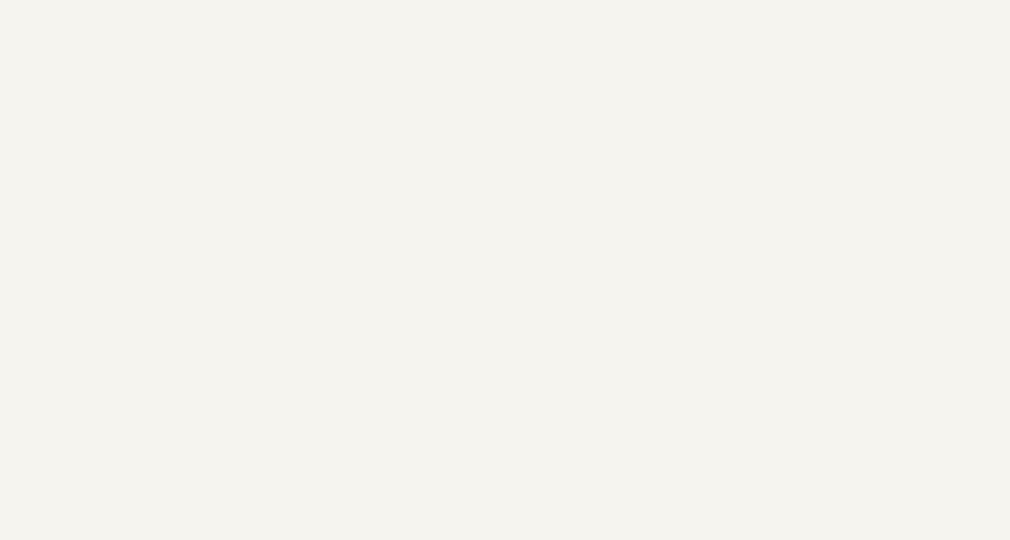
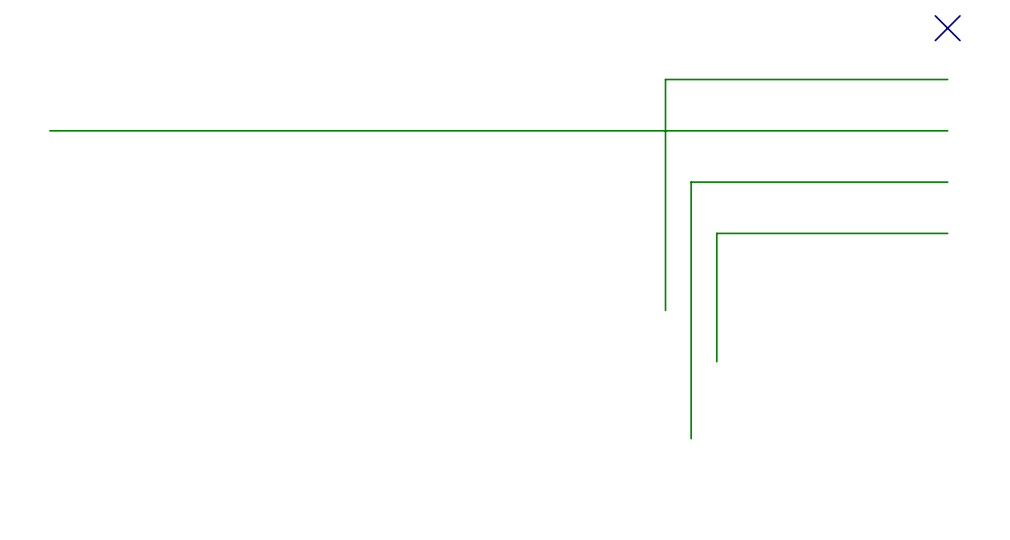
no-connect mark: none -> (947, 28)
wire: none -> (947, 79) (665, 79) (665, 310)
wire: none -> (49, 130) (947, 130)
wire: none -> (947, 182) (691, 182) (691, 438)
wire: none -> (947, 233) (716, 233) (716, 361)

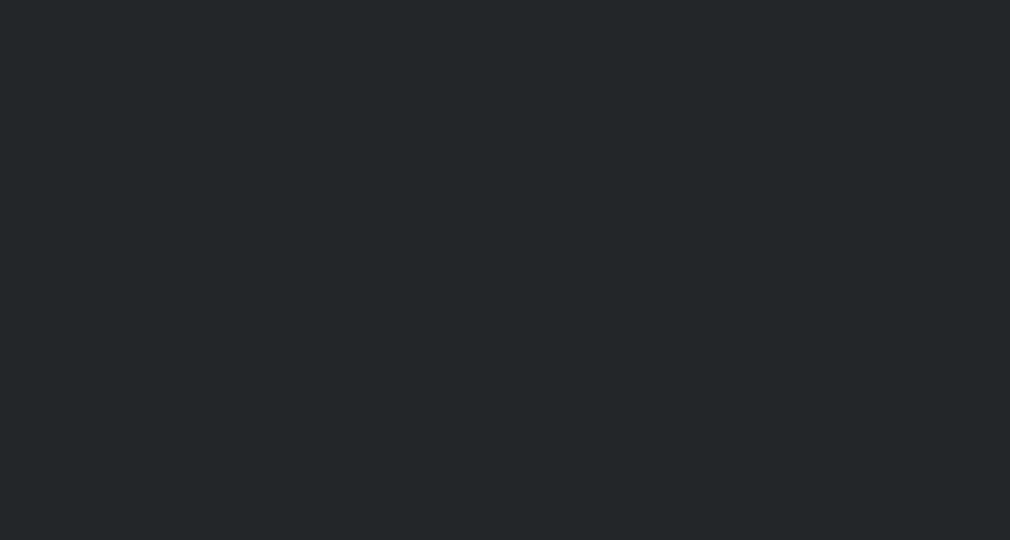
no-connect mark: (947, 28) -> none
wire: (947, 79) (665, 79) (665, 310) -> none
wire: (49, 130) (947, 130) -> none
wire: (947, 182) (691, 182) (691, 438) -> none
wire: (947, 233) (716, 233) (716, 361) -> none

